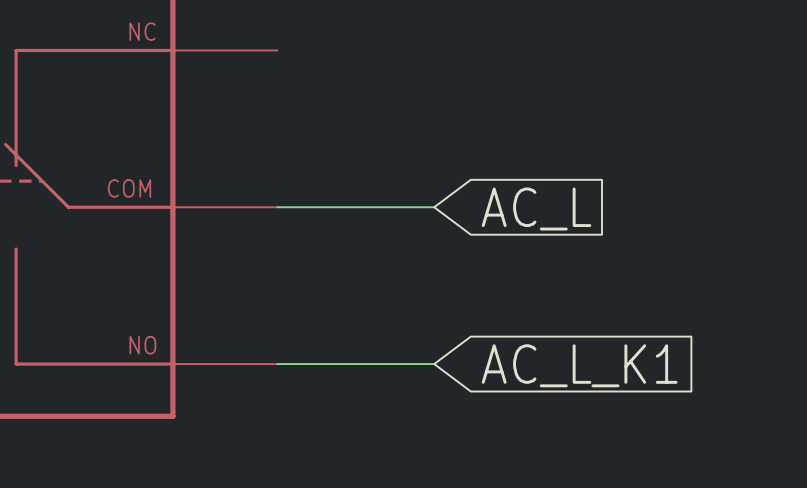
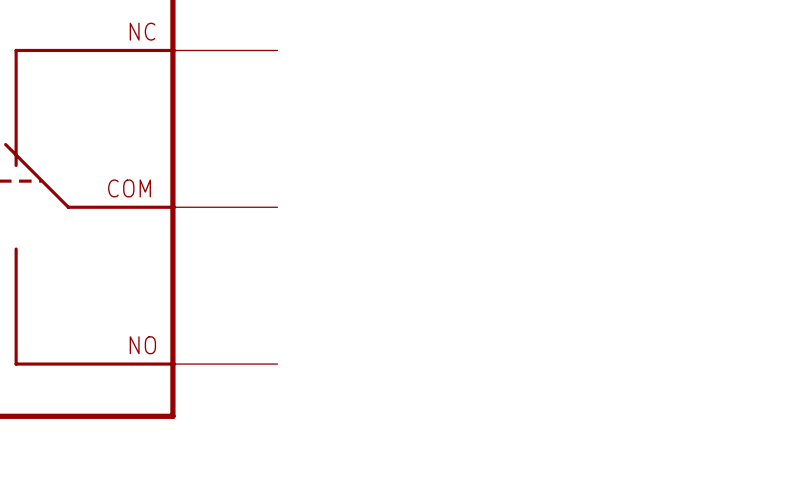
wire: (277, 207) (434, 207) -> none
global label: AC_L (536, 209) -> none
wire: (277, 364) (434, 364) -> none
global label: AC_L_K1 (579, 365) -> none

